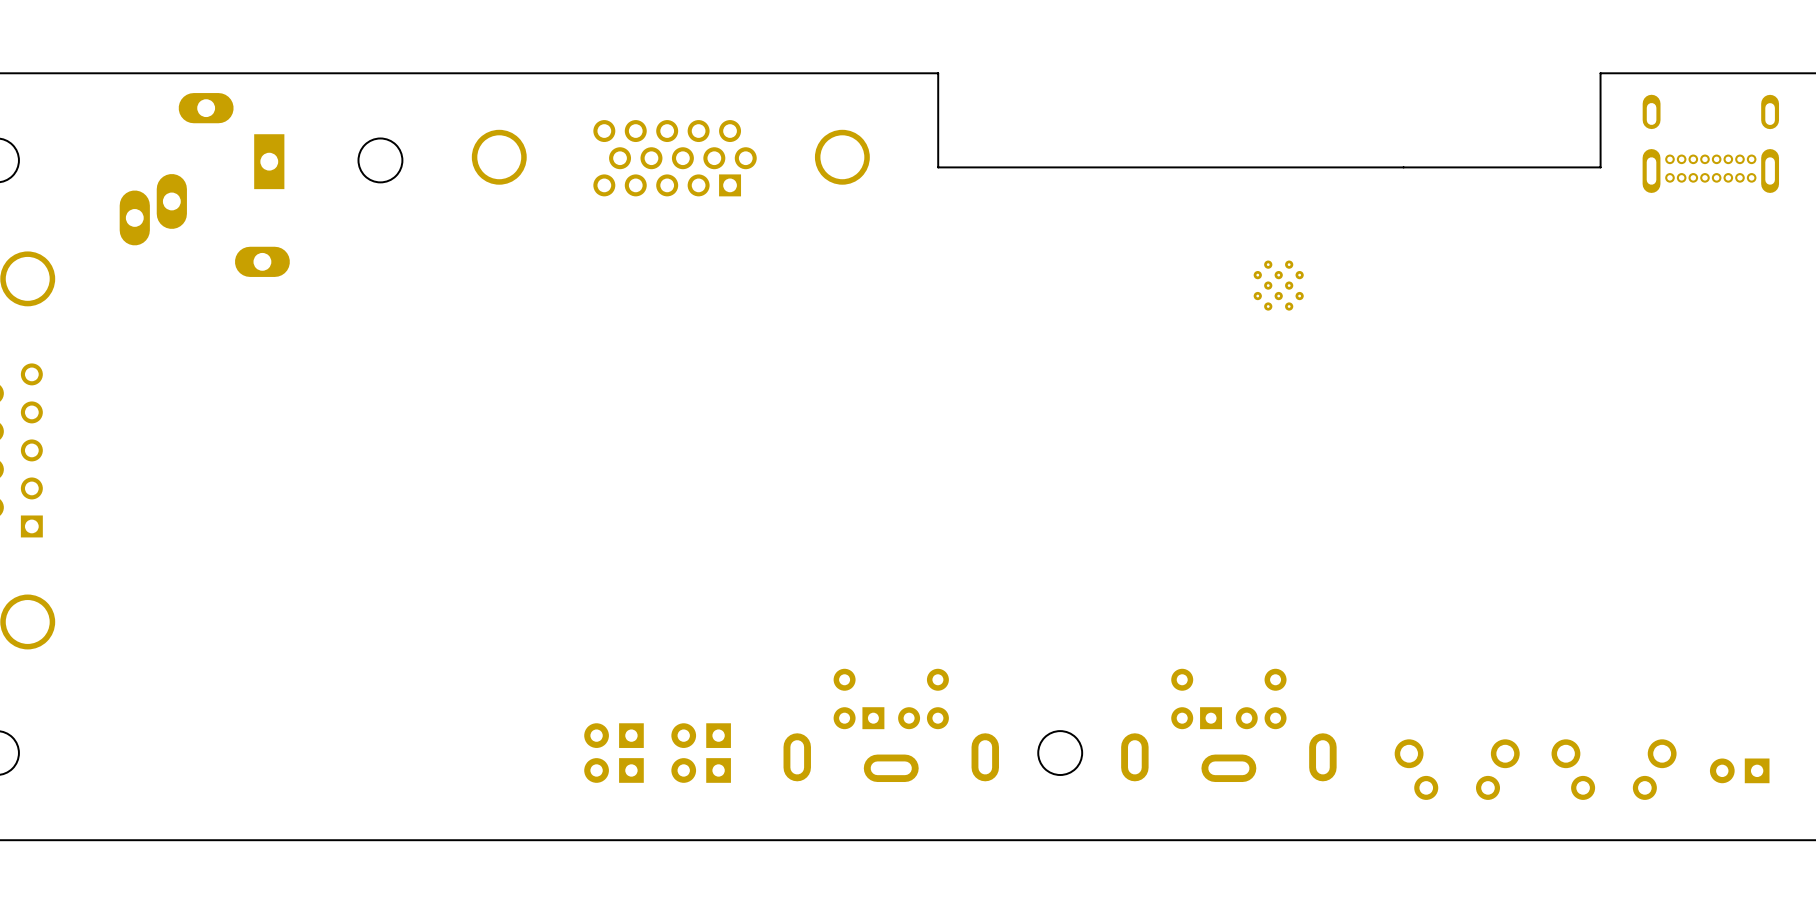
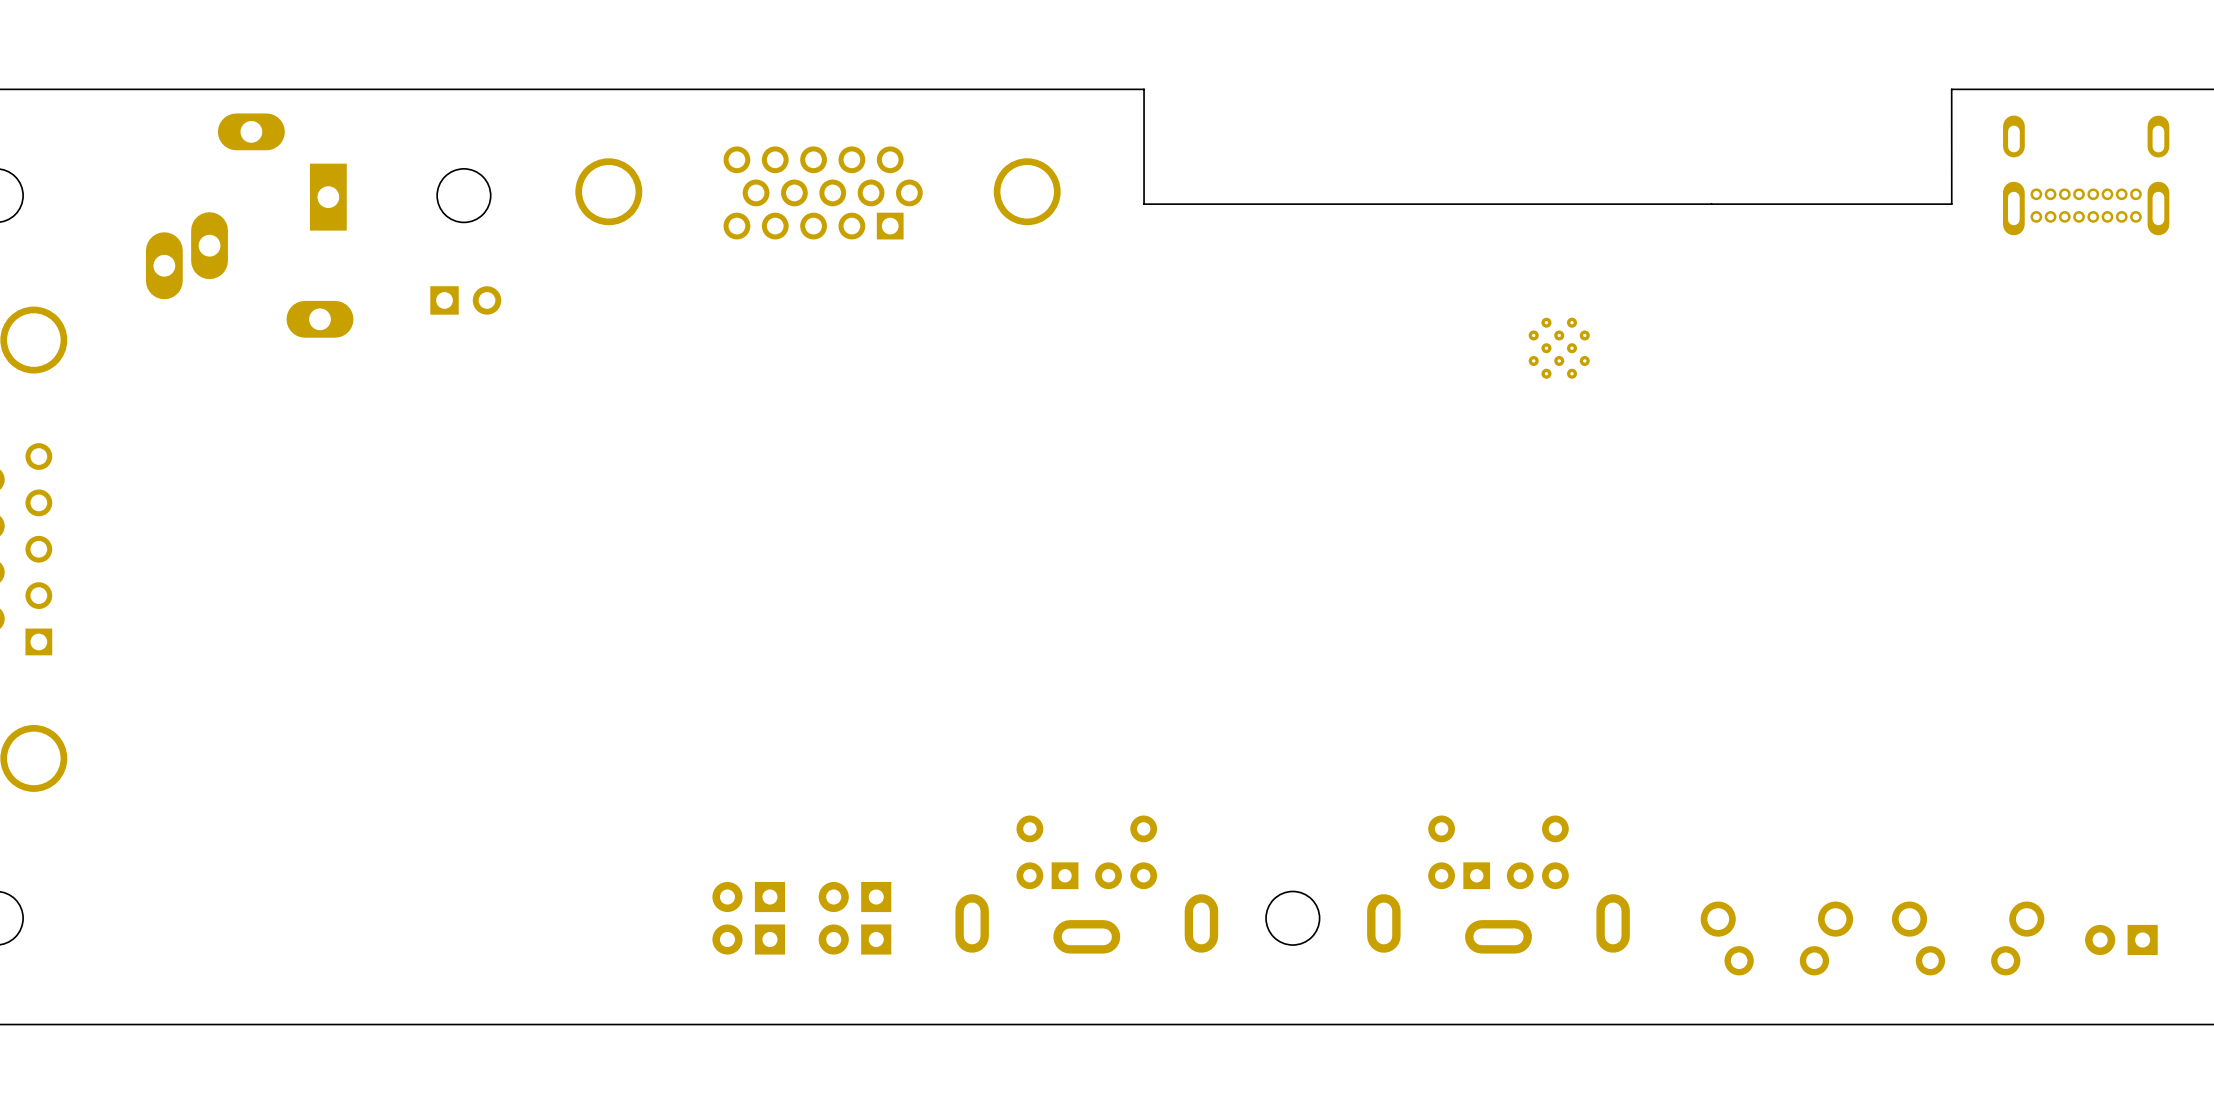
part: none -> (465, 300)

